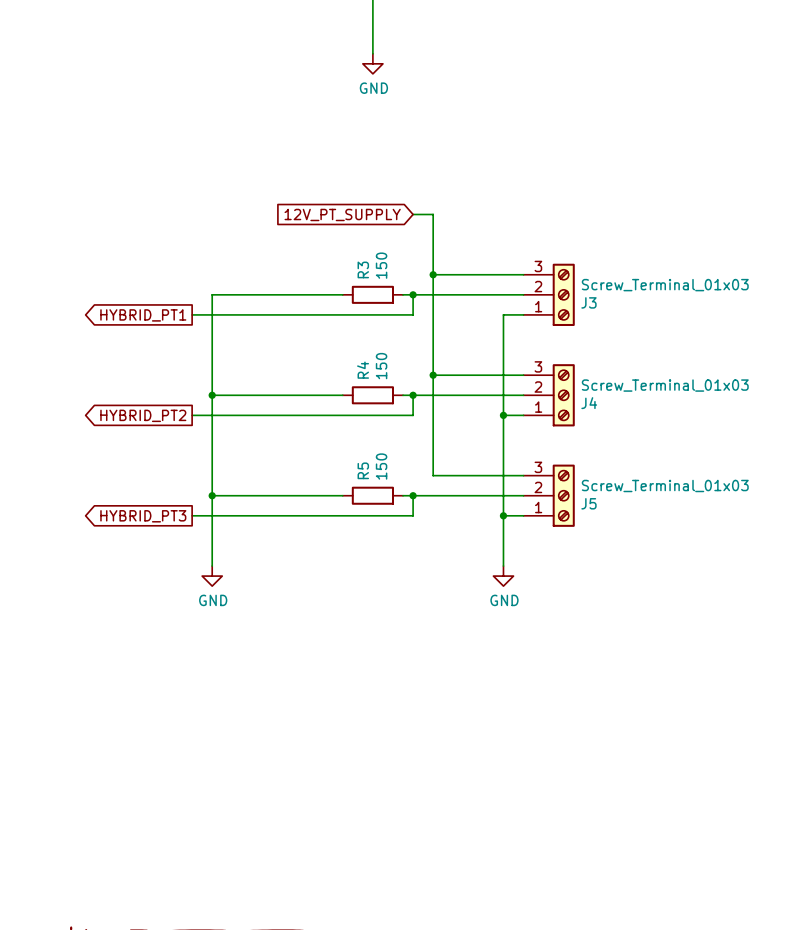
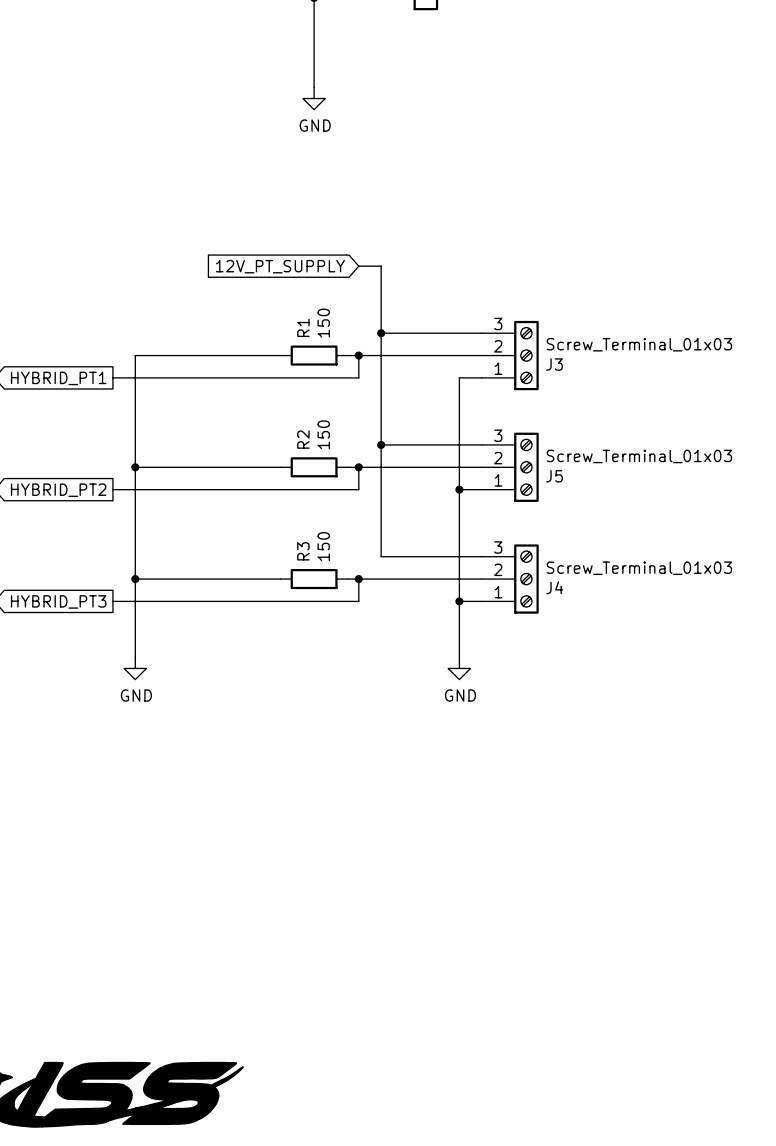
R3 name: R3 (363, 269) -> R1 (303, 327)
R4 name: R4 (363, 370) -> R2 (303, 439)
J4 name: J4 (589, 403) -> J5 (554, 476)
R5 name: R5 (363, 470) -> R3 (303, 551)
J5 name: J5 (588, 503) -> J4 (554, 587)

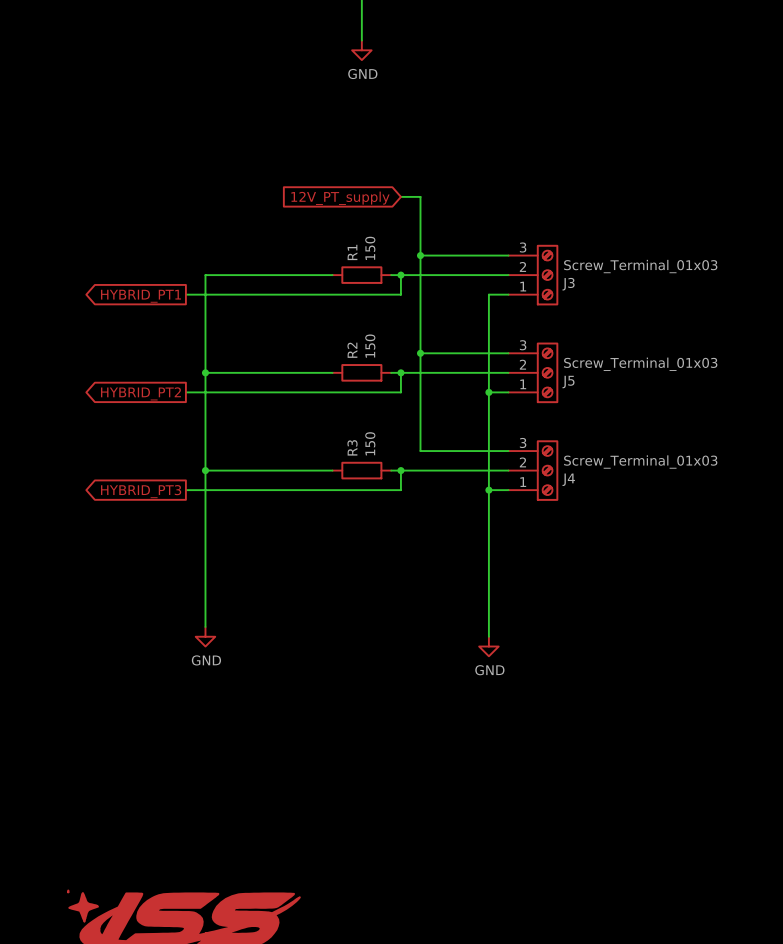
global label: 12V_PT_SUPPLY (280, 266) -> 12V_PT_supply (340, 198)
wire: none -> (205, 539) (205, 626)
wire: none -> (488, 539) (488, 636)
power symbol position: GND (135, 668) -> GND (205, 636)
power symbol position: GND (459, 668) -> GND (488, 646)

